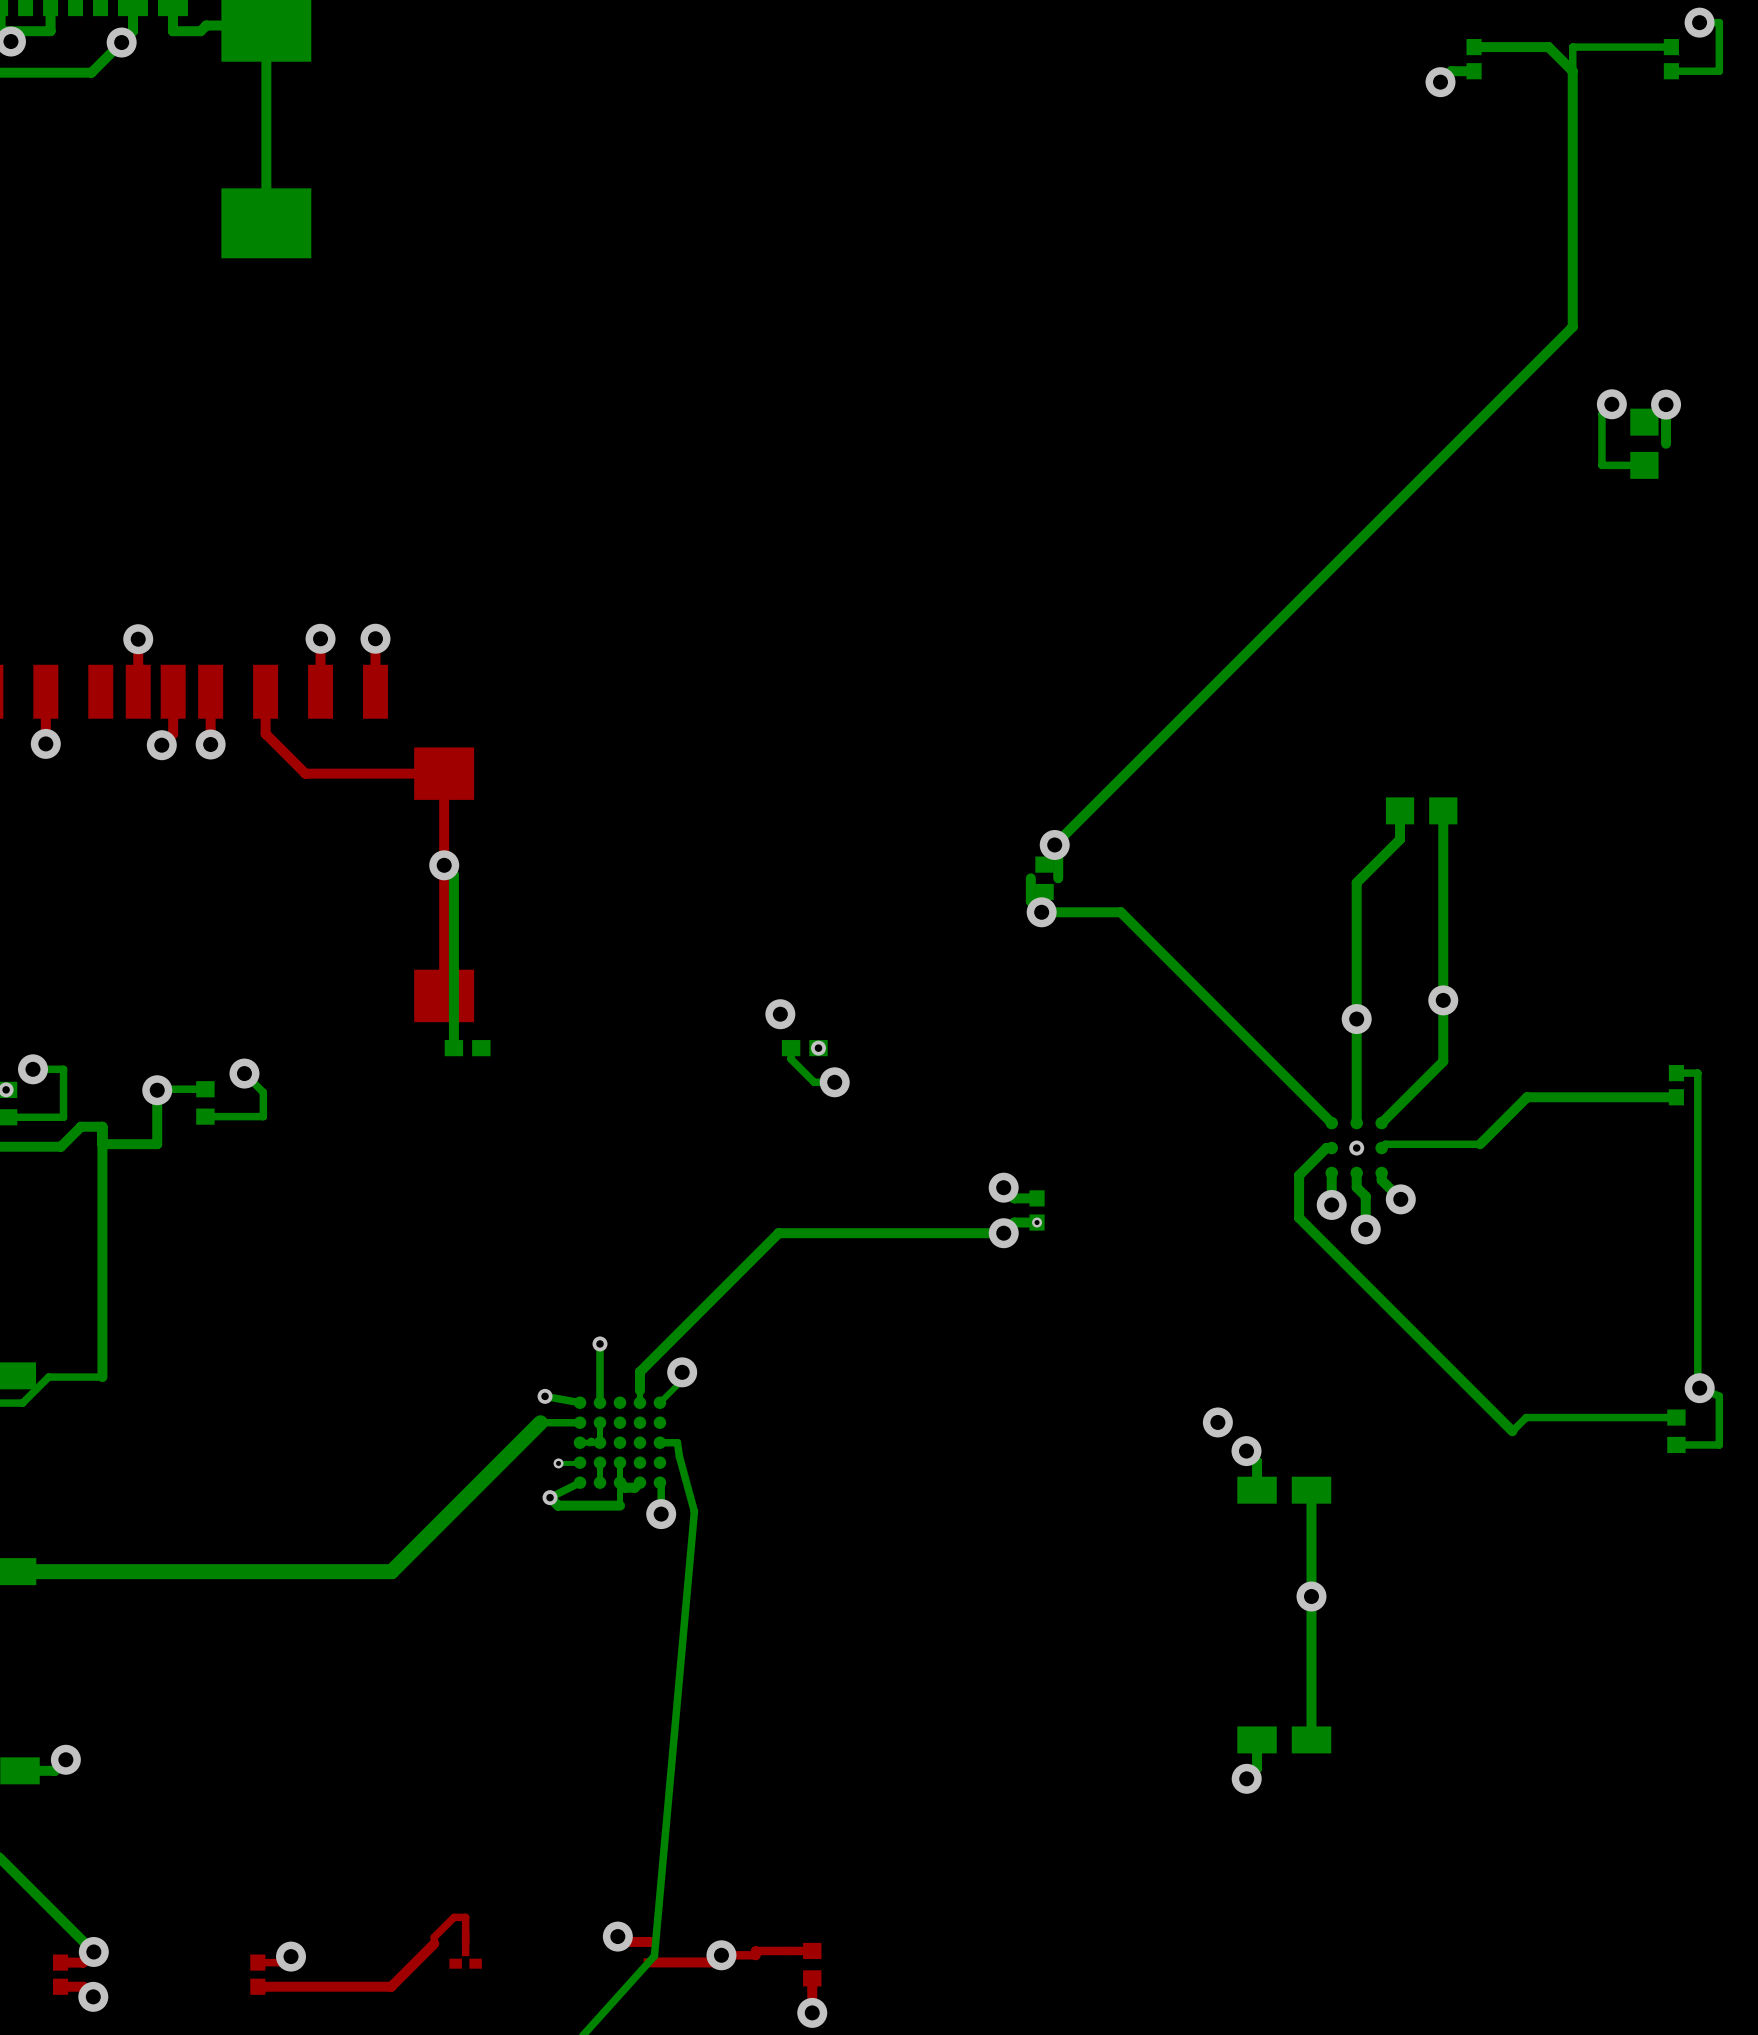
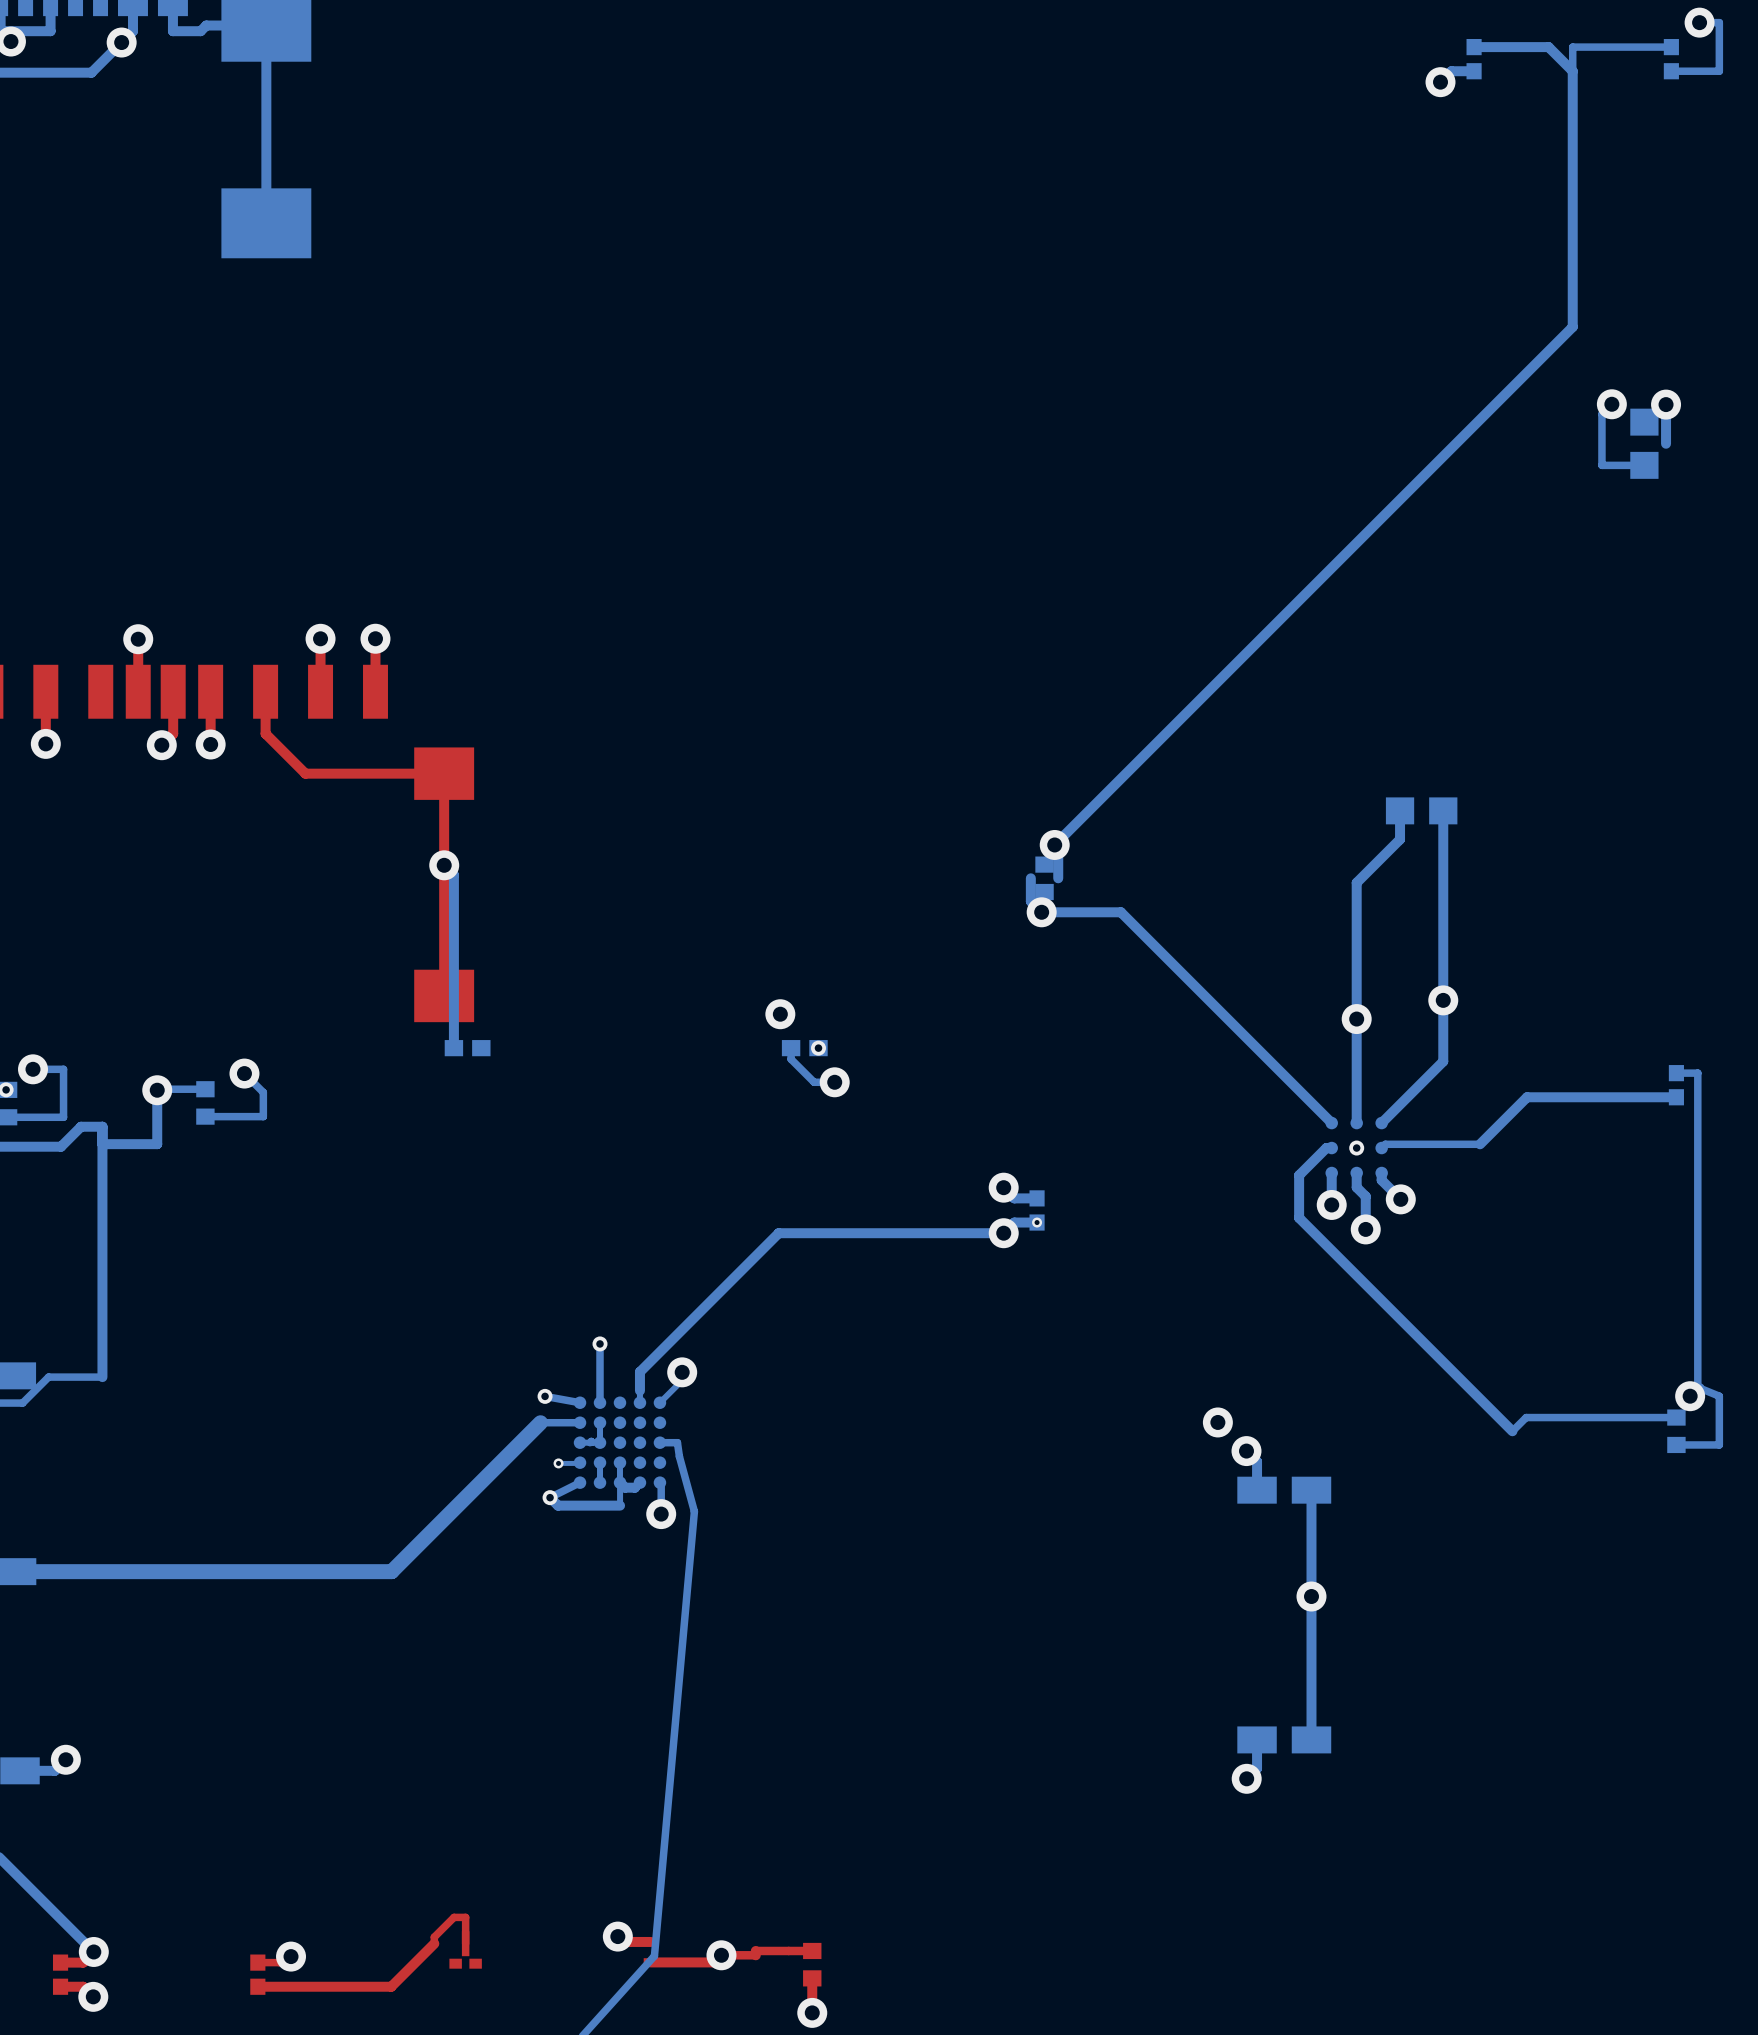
via position: (1699, 1388) -> (1690, 1396)

